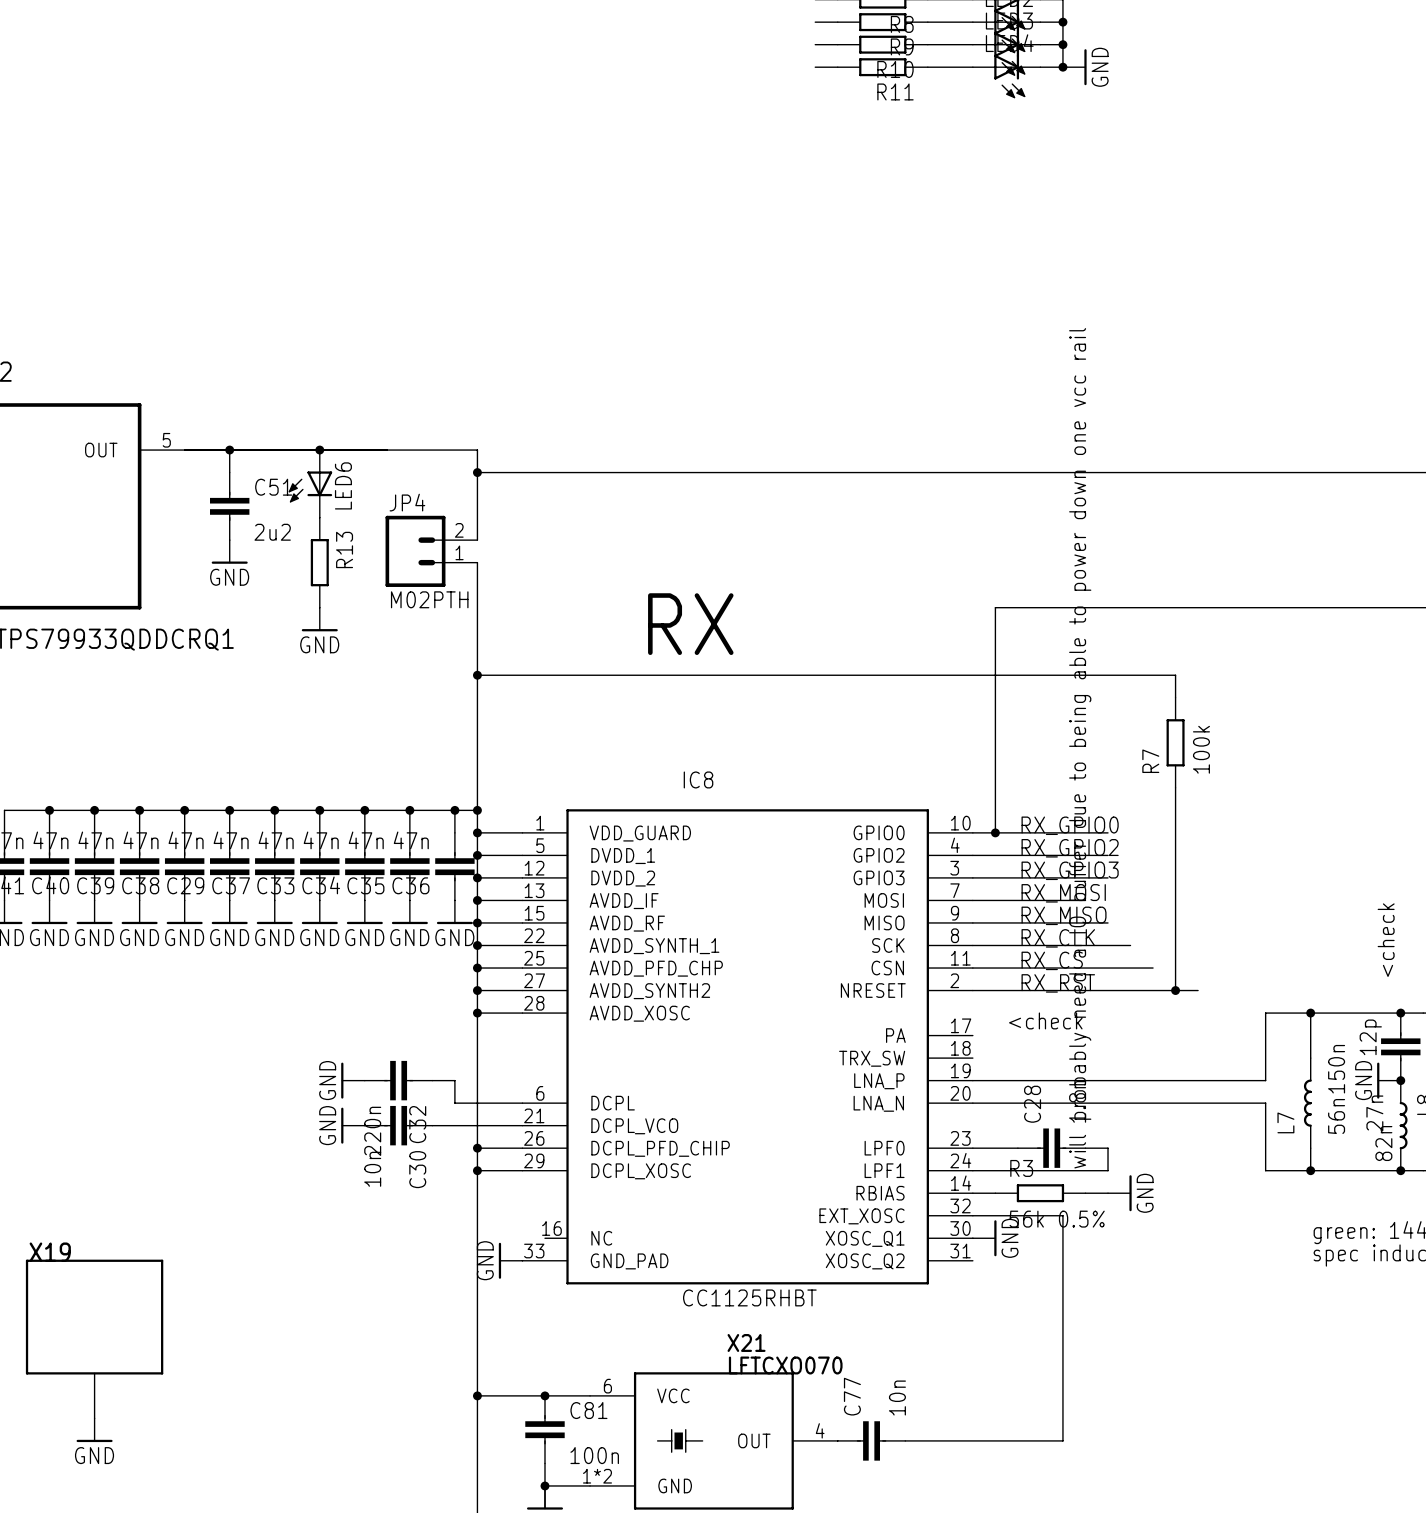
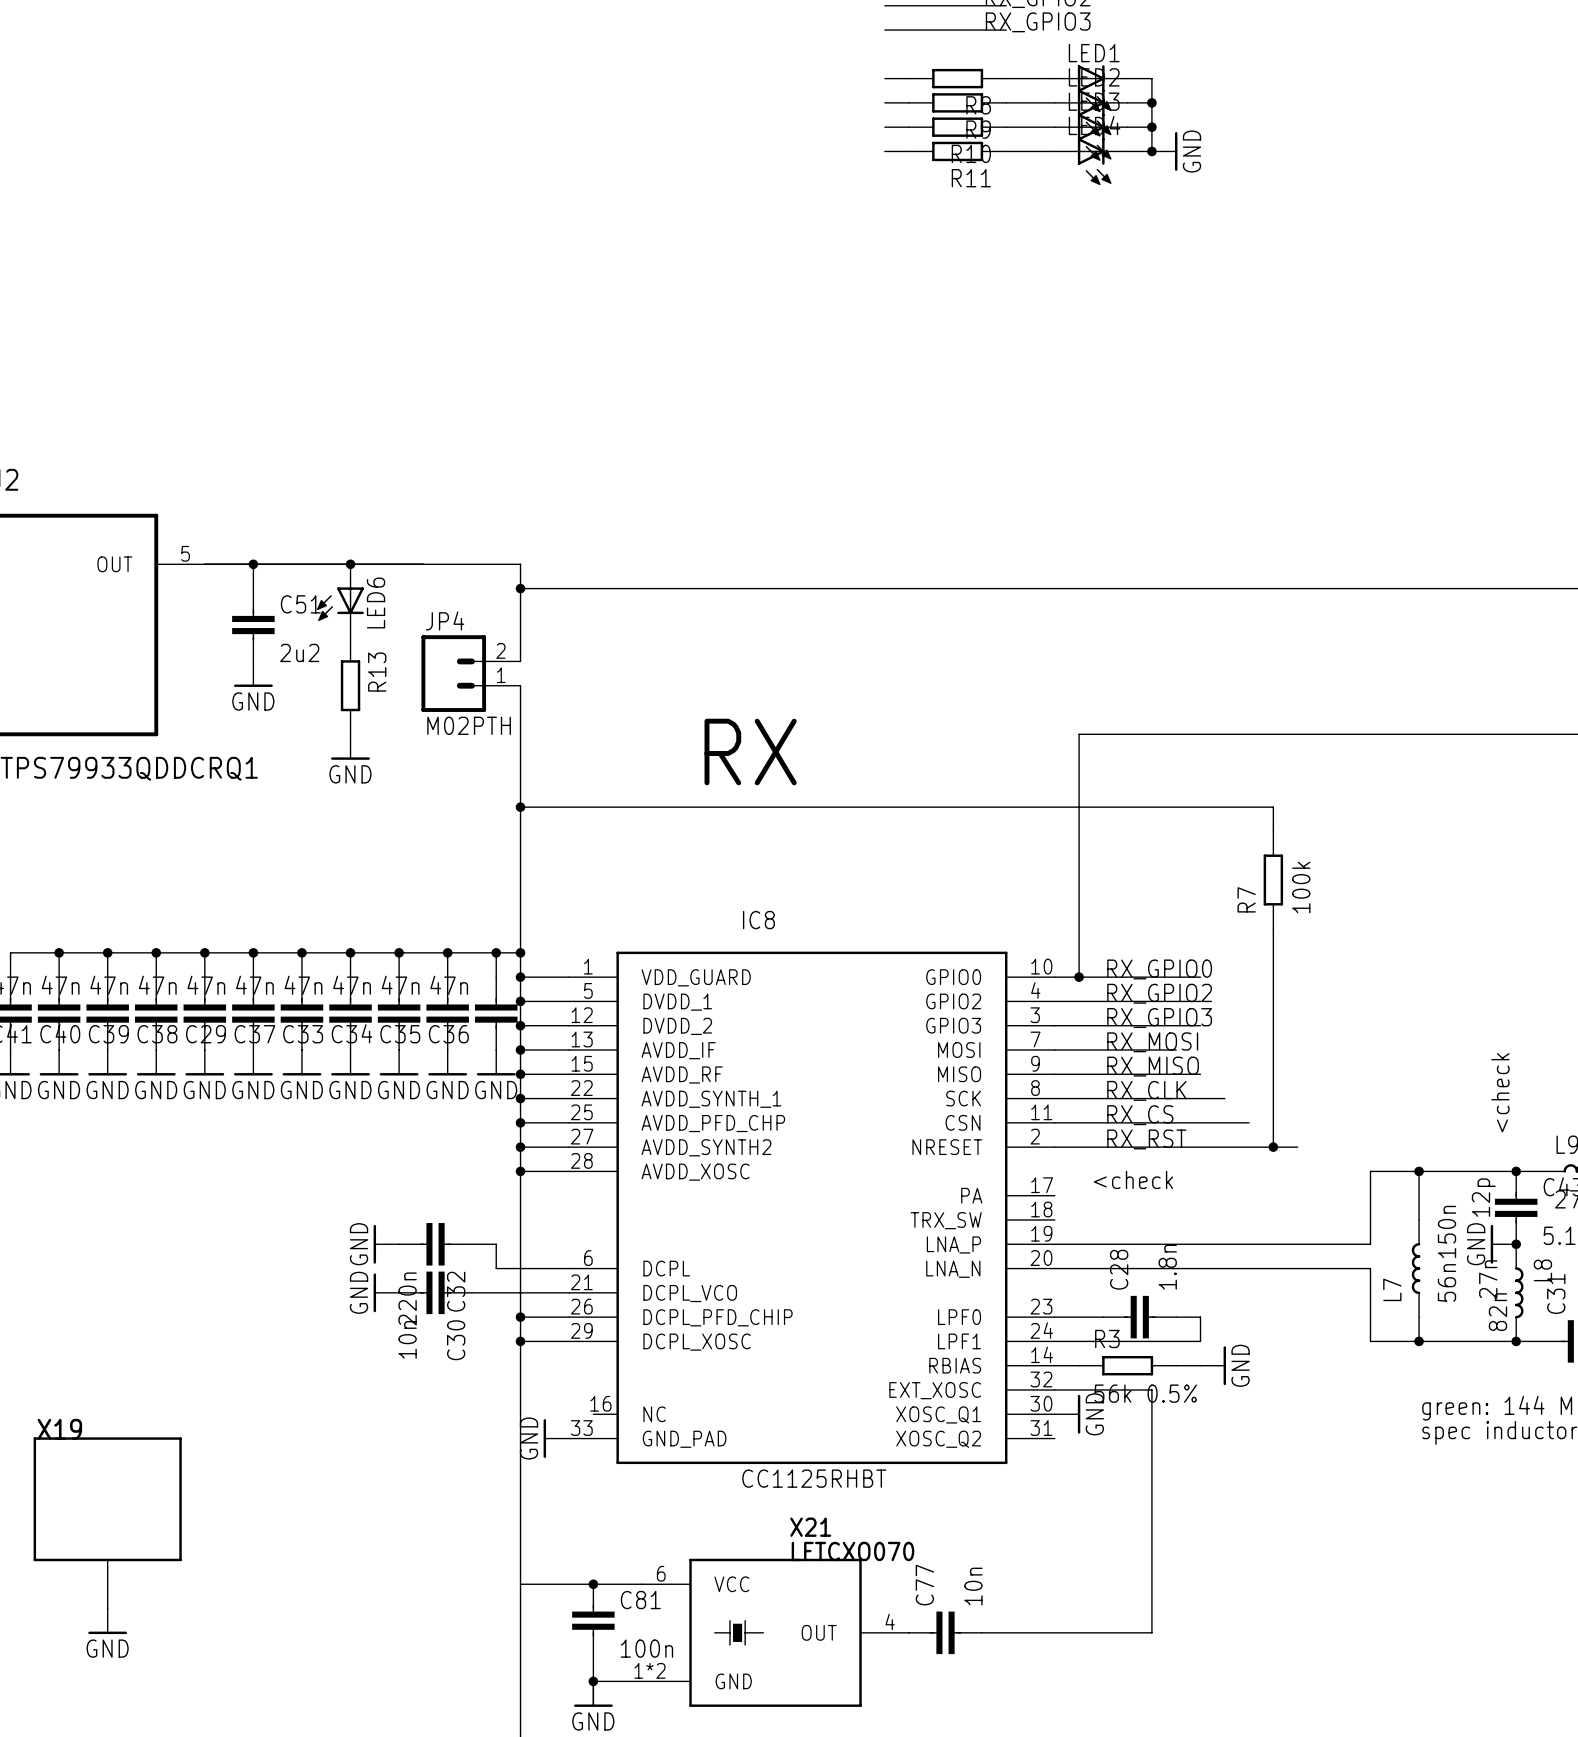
text: will probably need a IO buffer due to being able to power down one vcc rail (1080, 748) -> none
junction: (477, 1395) -> none

